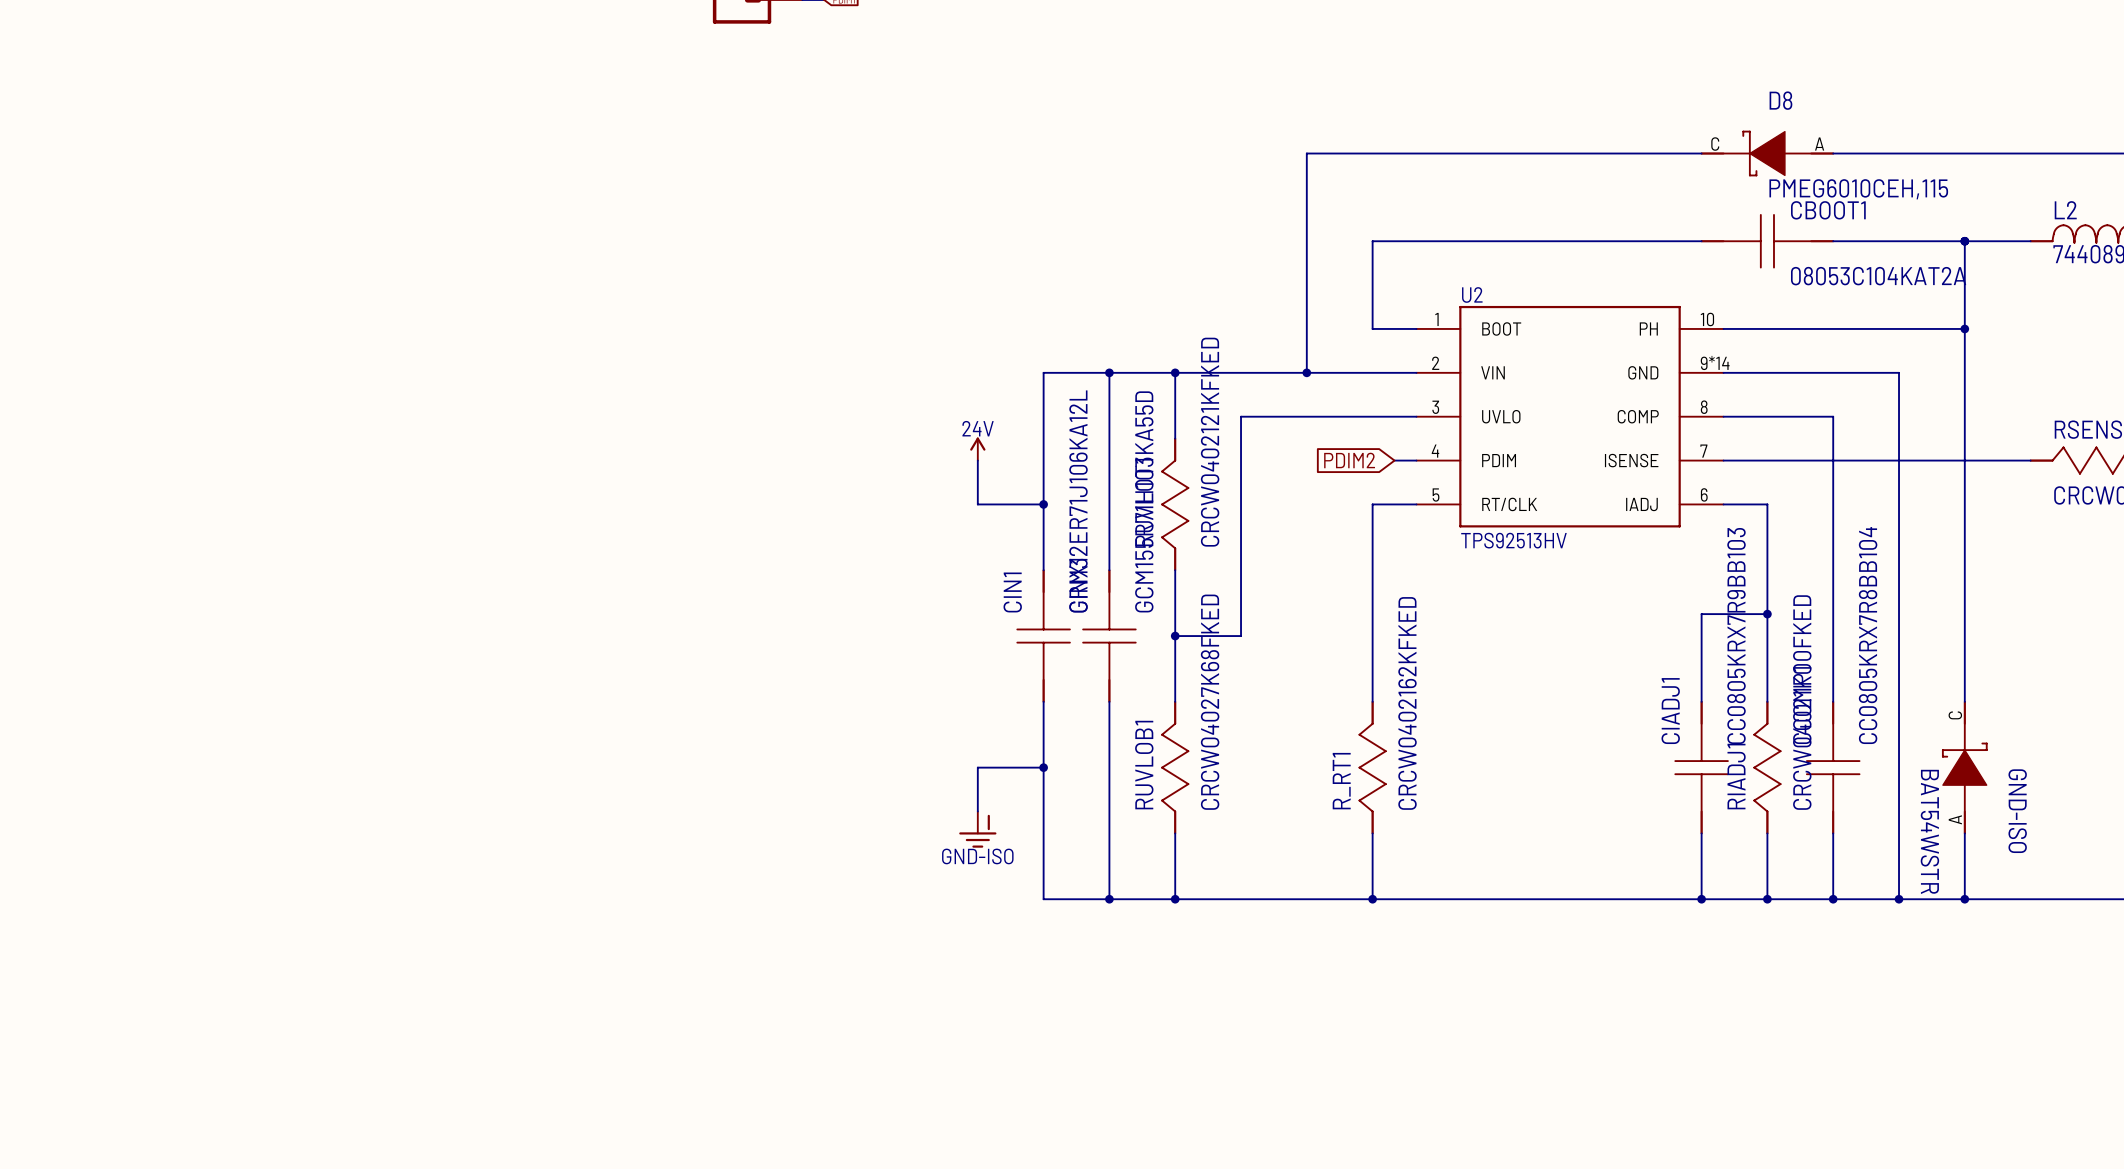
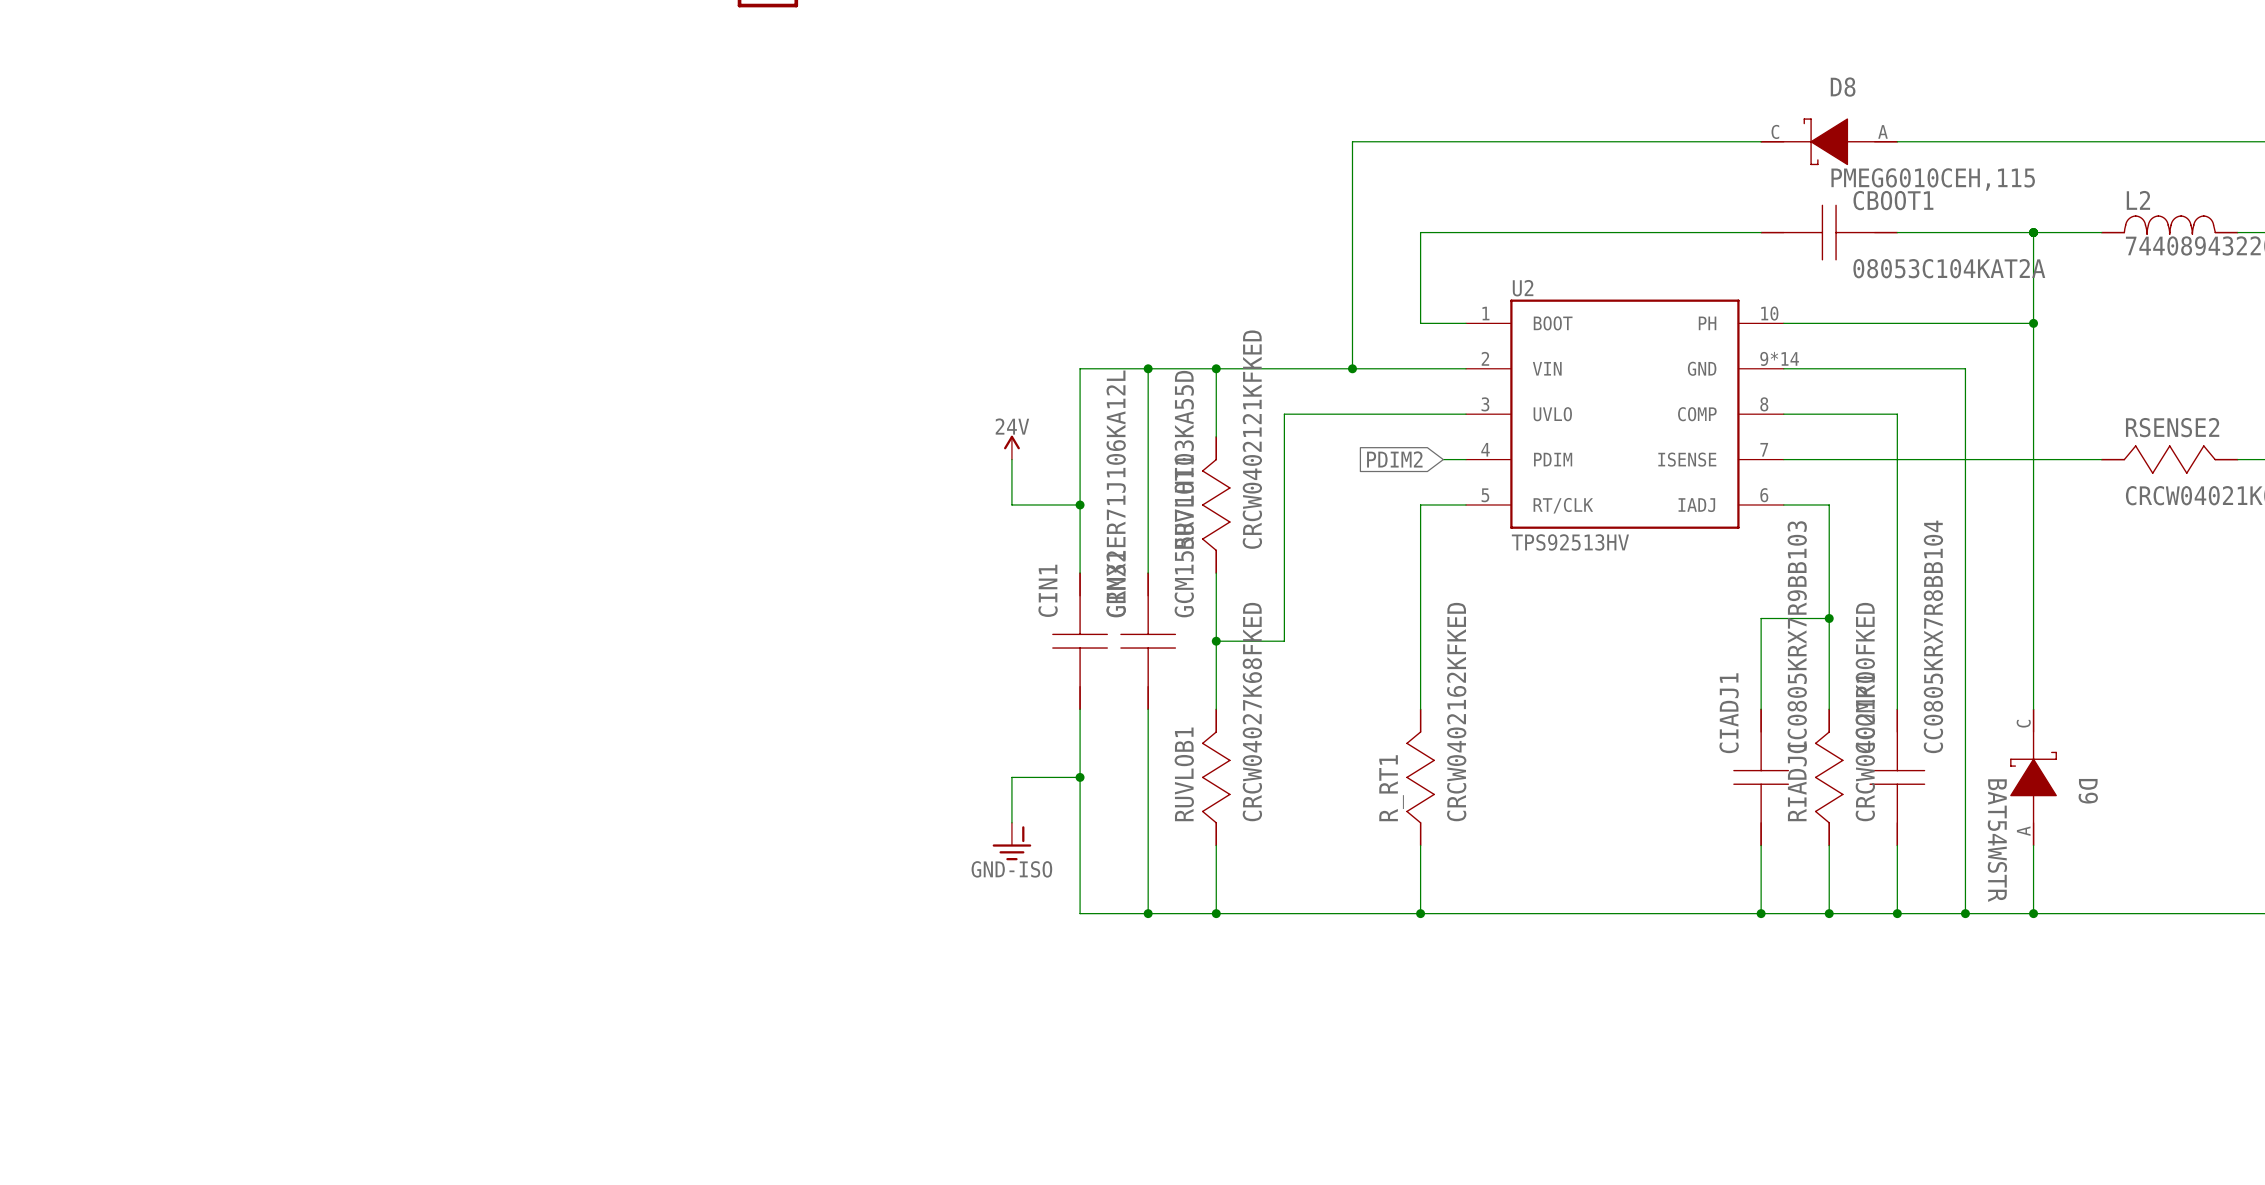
GND-ISO name: GND-ISO (2017, 811) -> D9 (2088, 791)

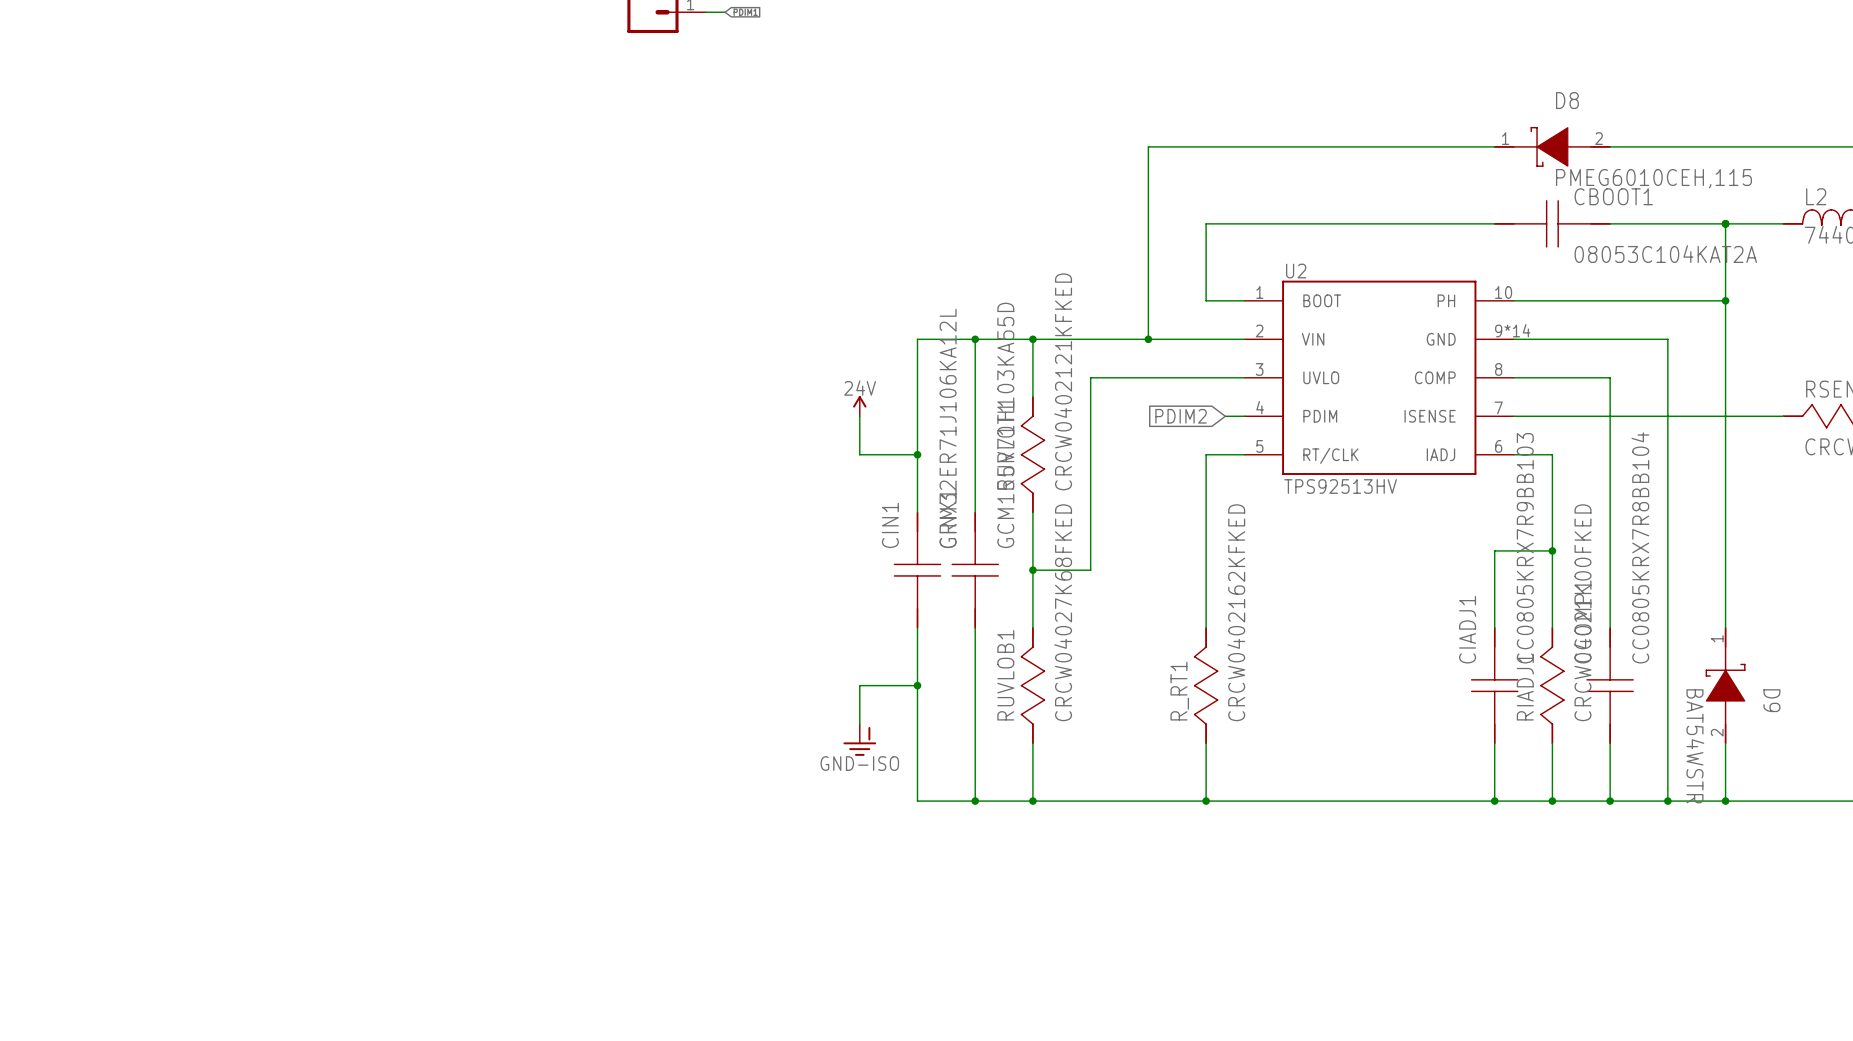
D8 pin number: C (1775, 131) -> 1 (1505, 138)
D8 pin number: A (1883, 131) -> 2 (1599, 138)
D9 pin number: C (2023, 723) -> 1 (1717, 638)
D9 pin number: A (2023, 831) -> 2 (1717, 732)

